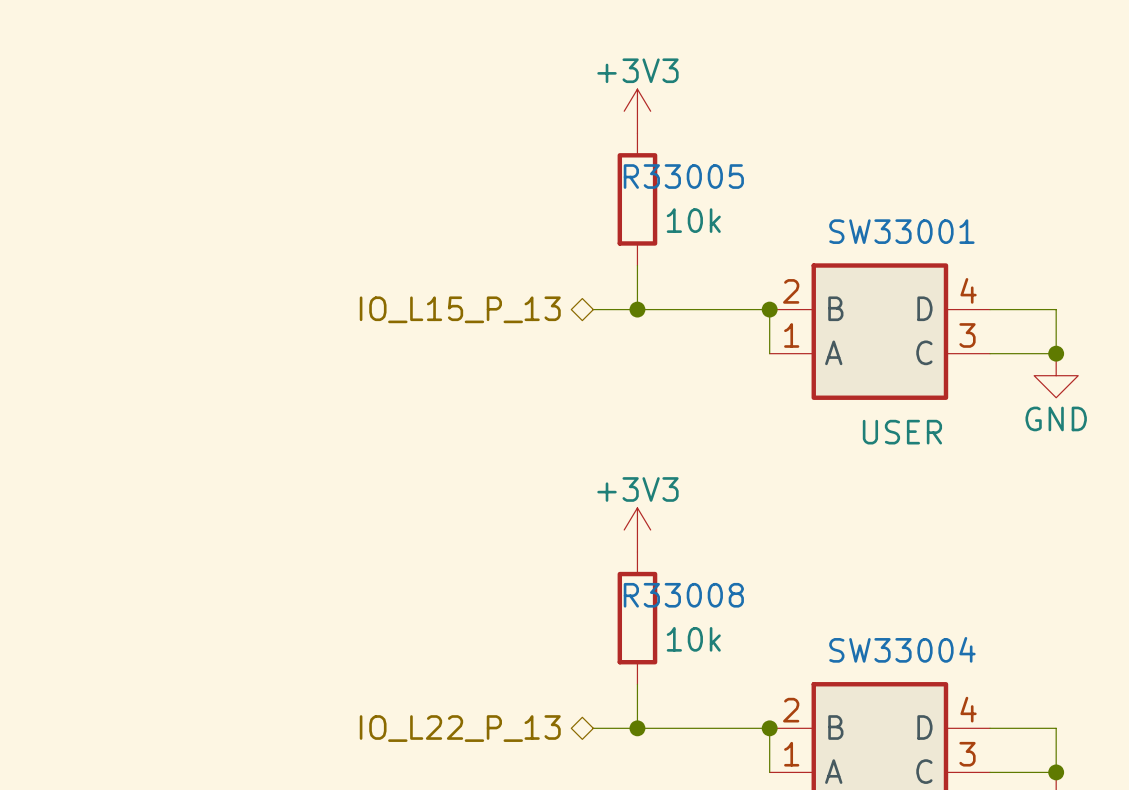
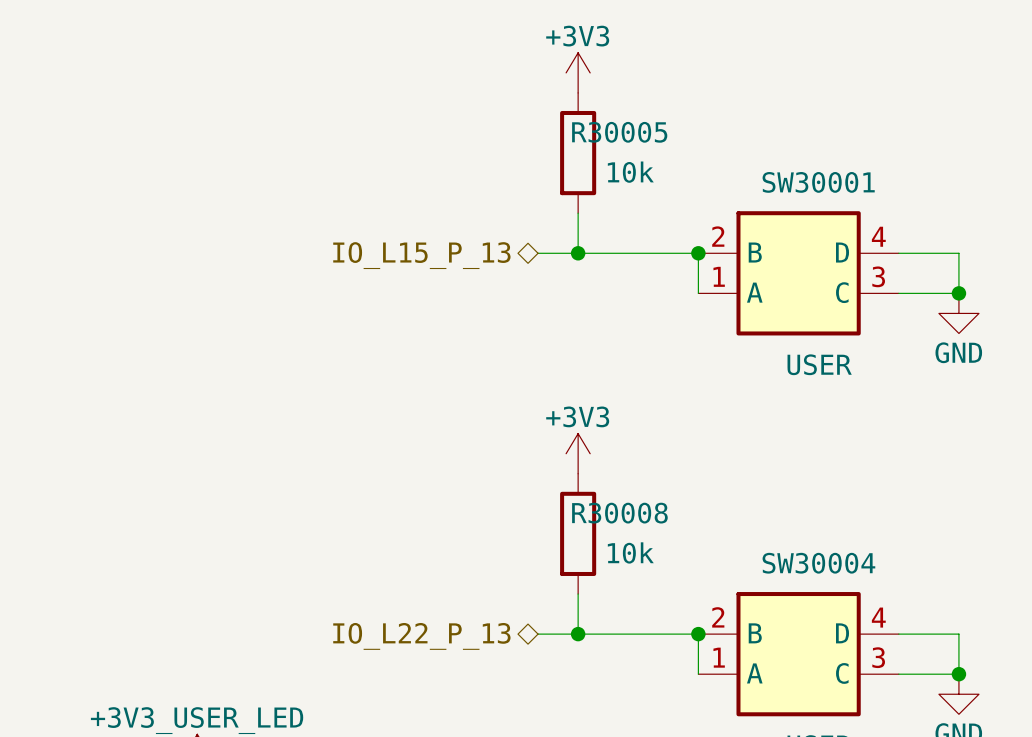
R33005 name: R33005 (683, 176) -> R30005 (619, 132)
SW33001 name: SW33001 (901, 231) -> SW30001 (818, 182)
R33008 name: R33008 (683, 595) -> R30008 (619, 513)
SW33004 name: SW33004 (902, 649) -> SW30004 (818, 563)

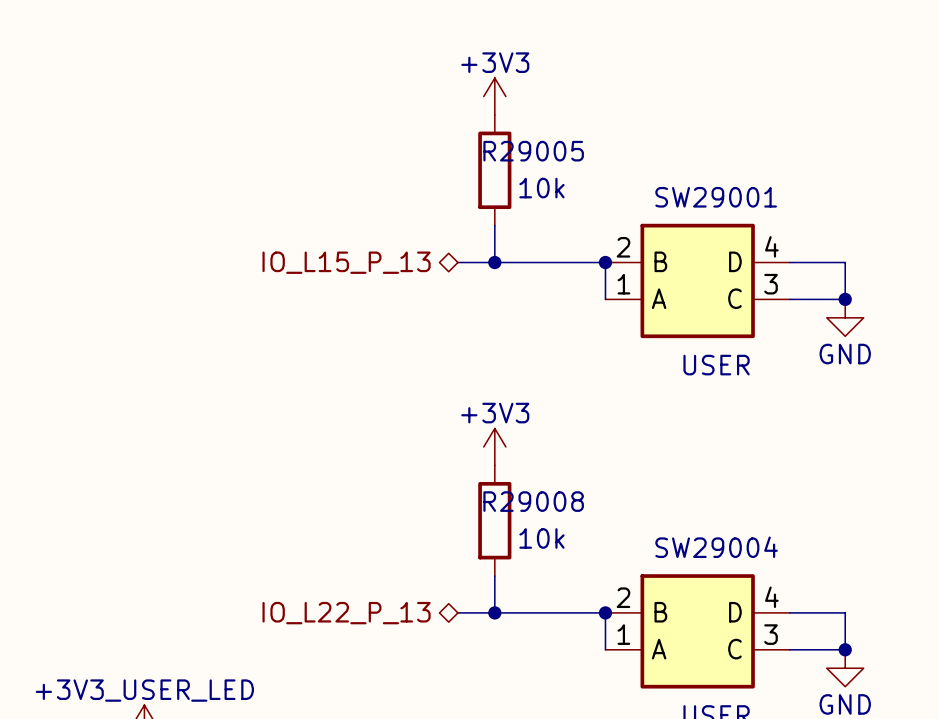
R30005 name: R30005 (619, 132) -> R29005 (533, 151)
SW30001 name: SW30001 (818, 182) -> SW29001 (716, 197)
R30008 name: R30008 (619, 513) -> R29008 (533, 501)
SW30004 name: SW30004 (818, 563) -> SW29004 (716, 547)

